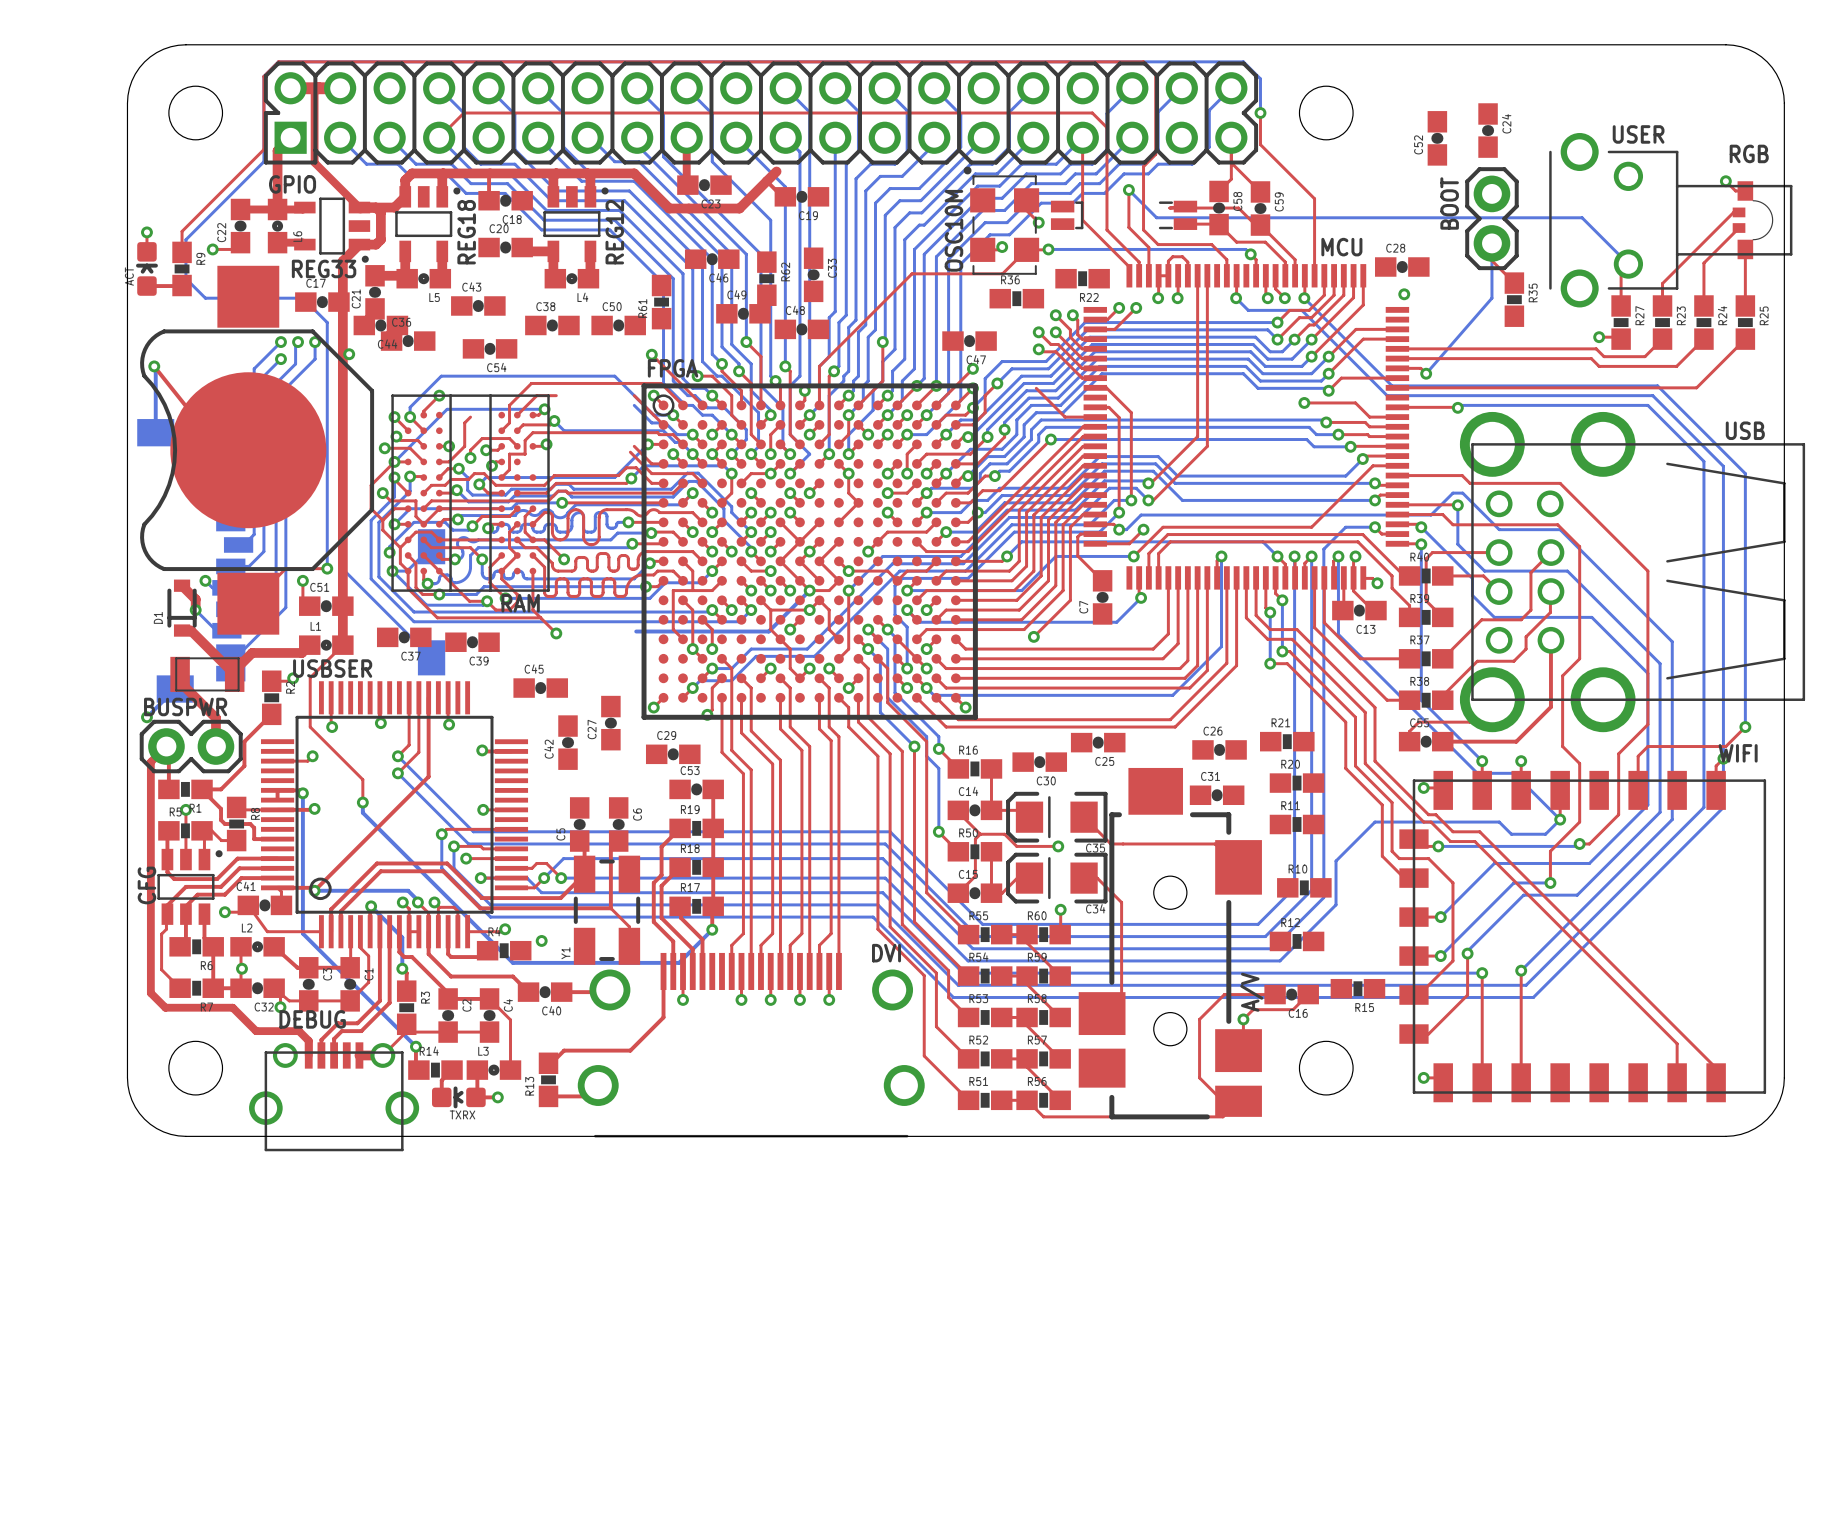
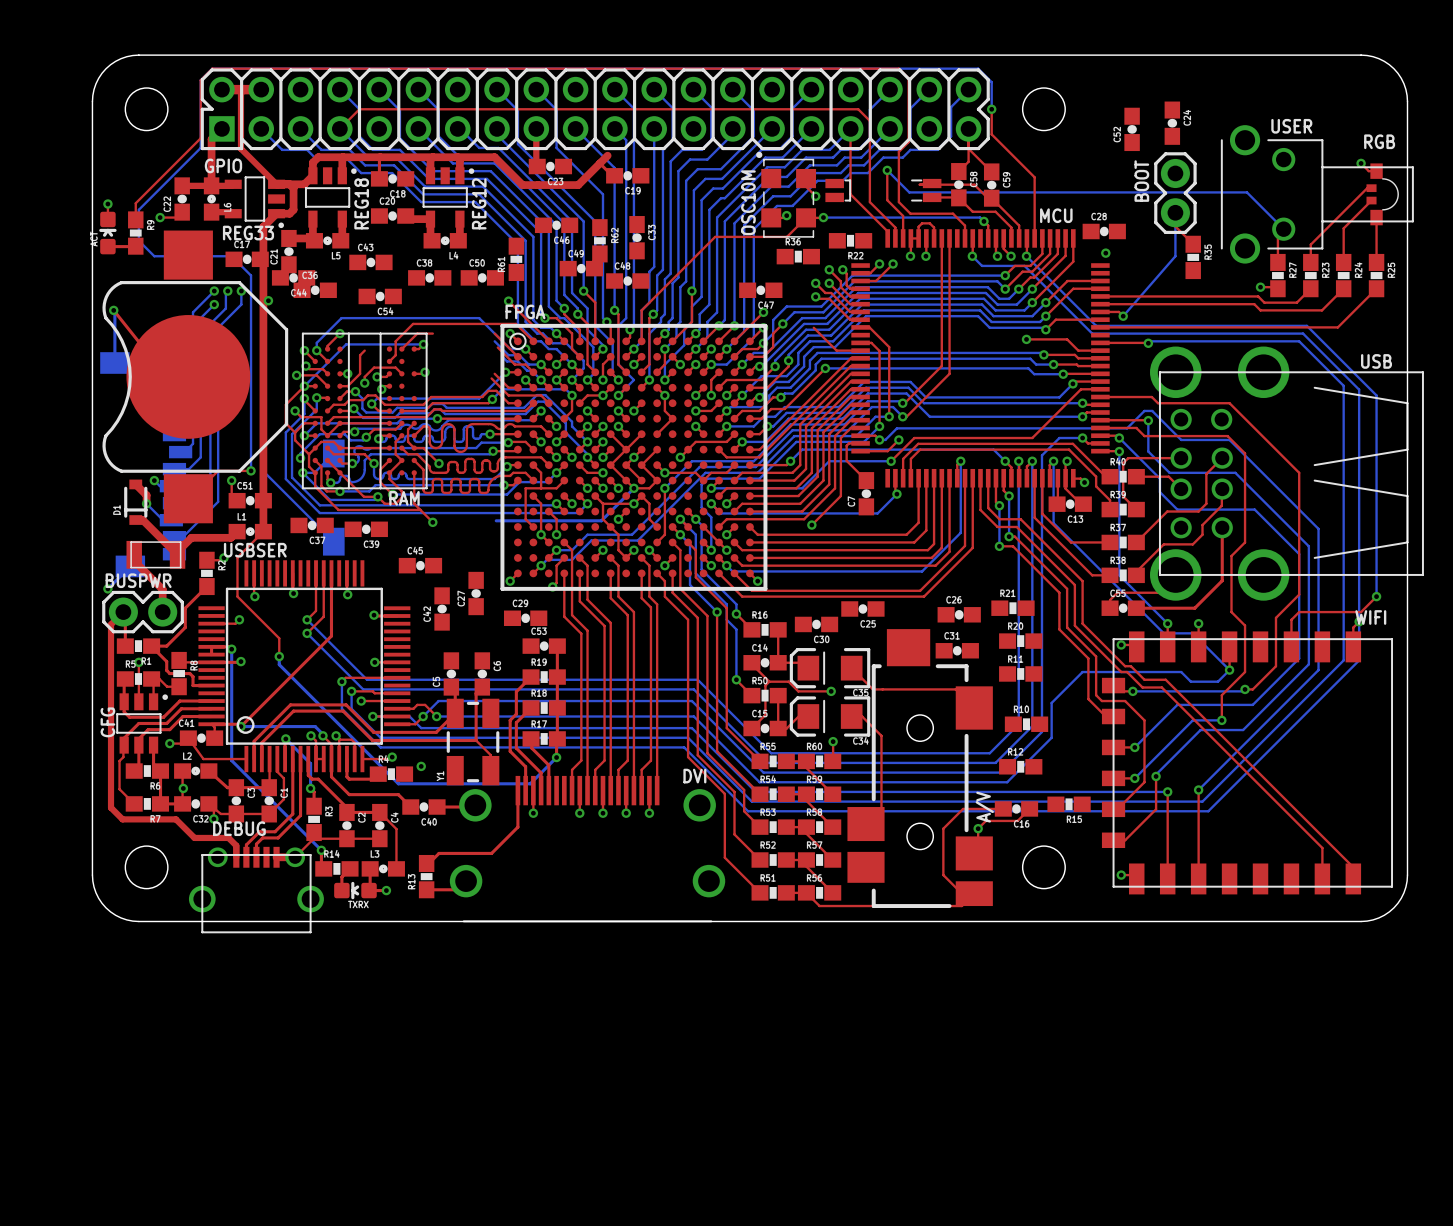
top track: (554, 420) (550, 424) (523, 424) (517, 430) -> none
bottom track: (554, 420) (564, 430) (649, 430) -> (502, 356) (507, 361)
via: (554, 420) -> none
top track: (657, 432) (532, 432) (525, 440) (525, 454) (509, 454) (509, 469) (501, 477) -> (513, 362) (497, 347)

